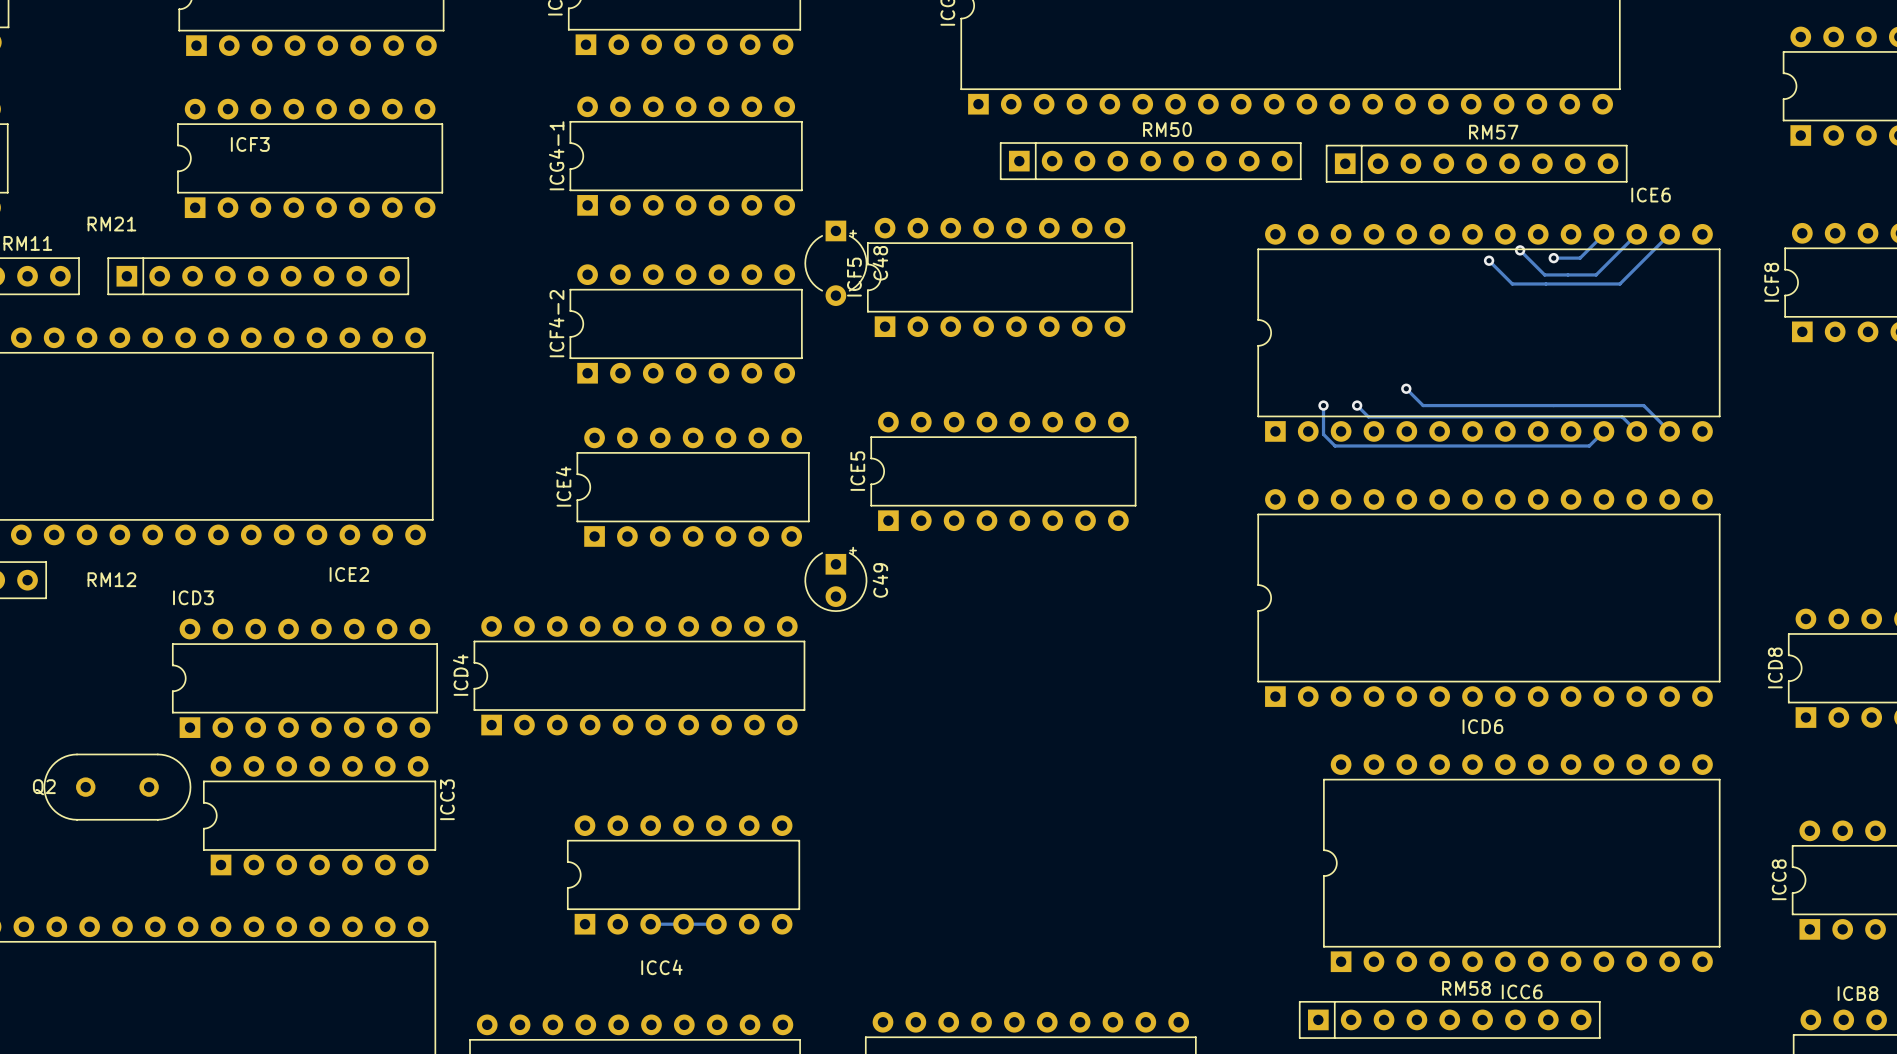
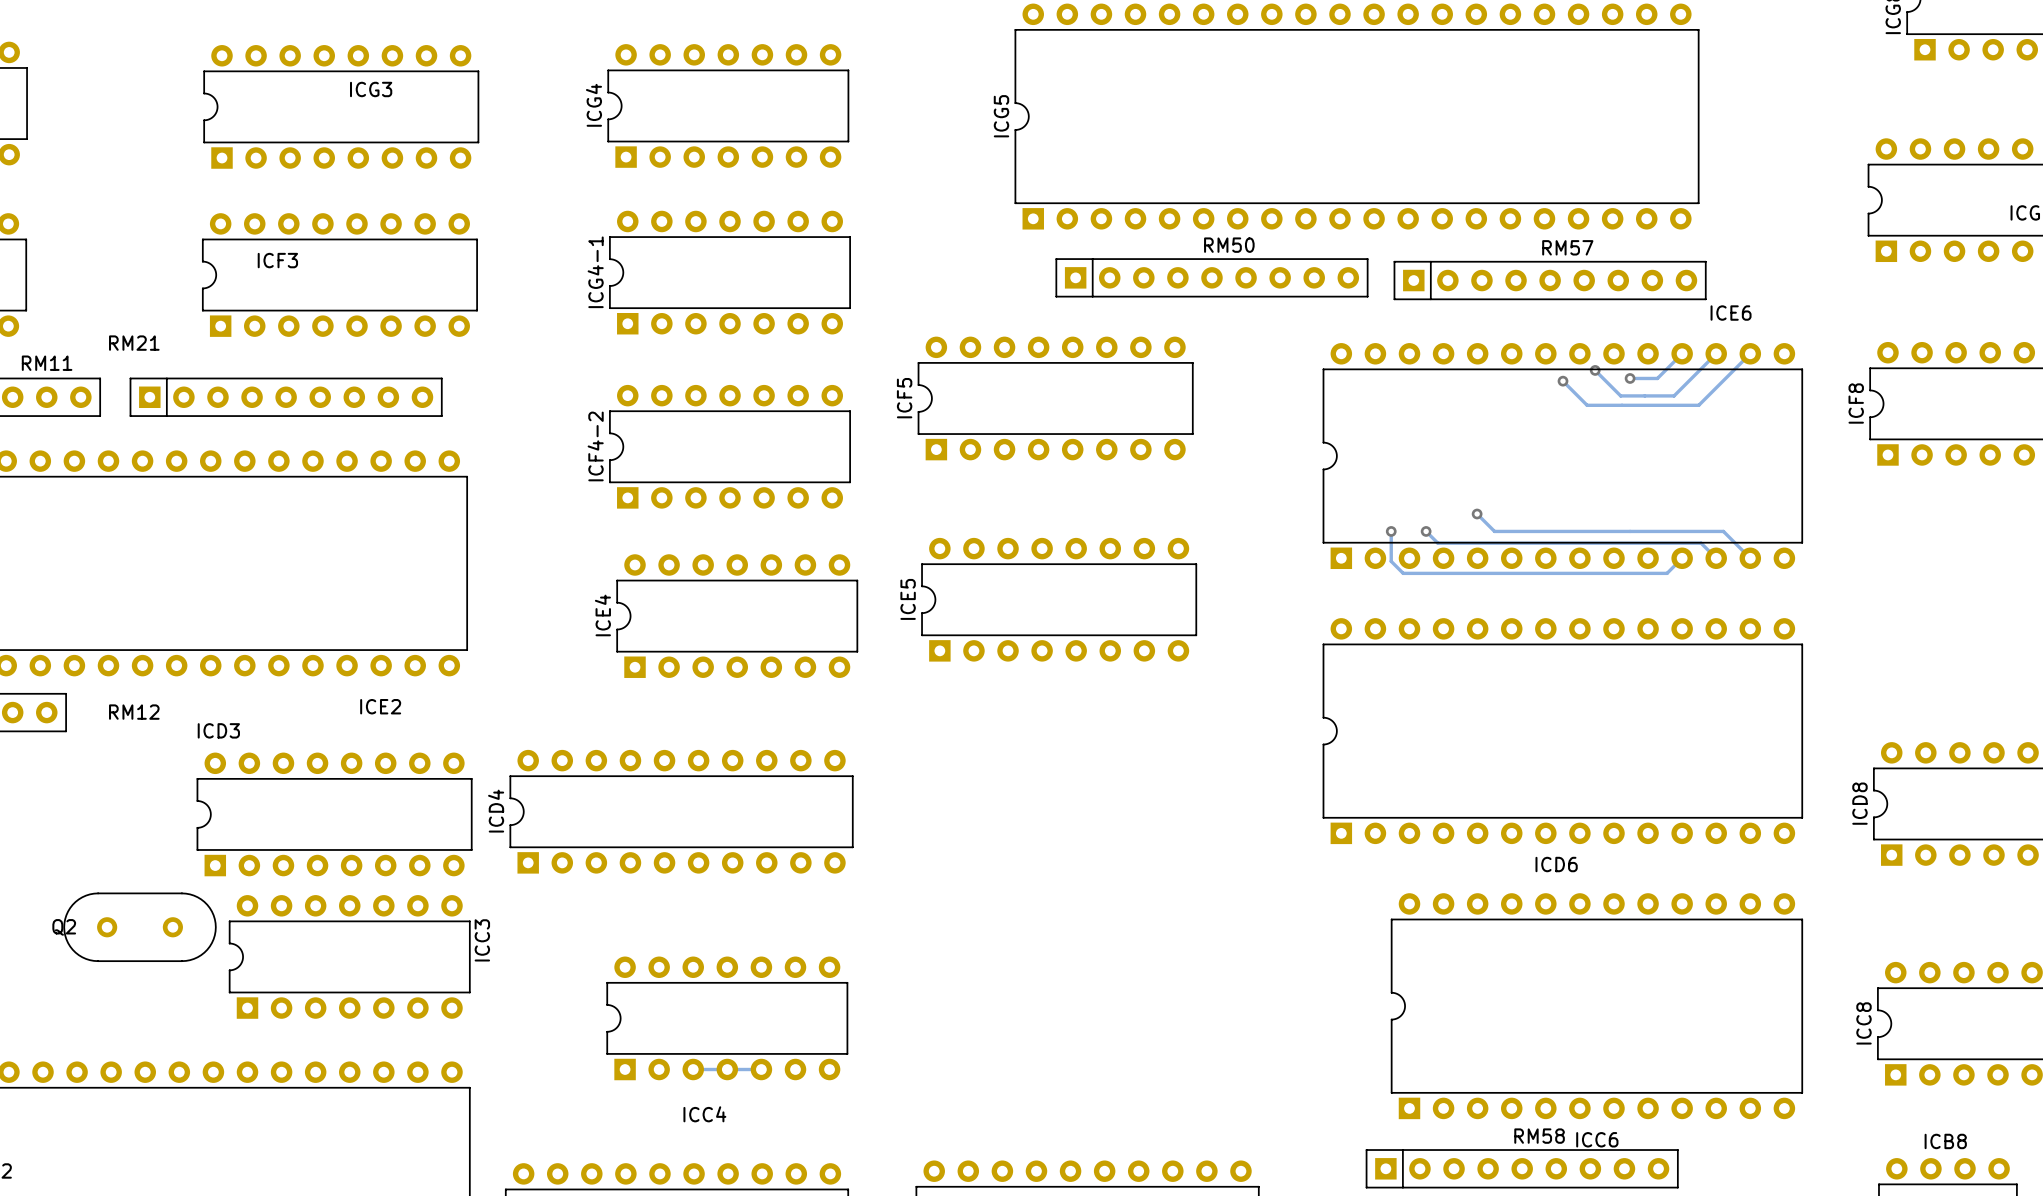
C48: (835, 263) -> none
C49: (835, 579) -> none

